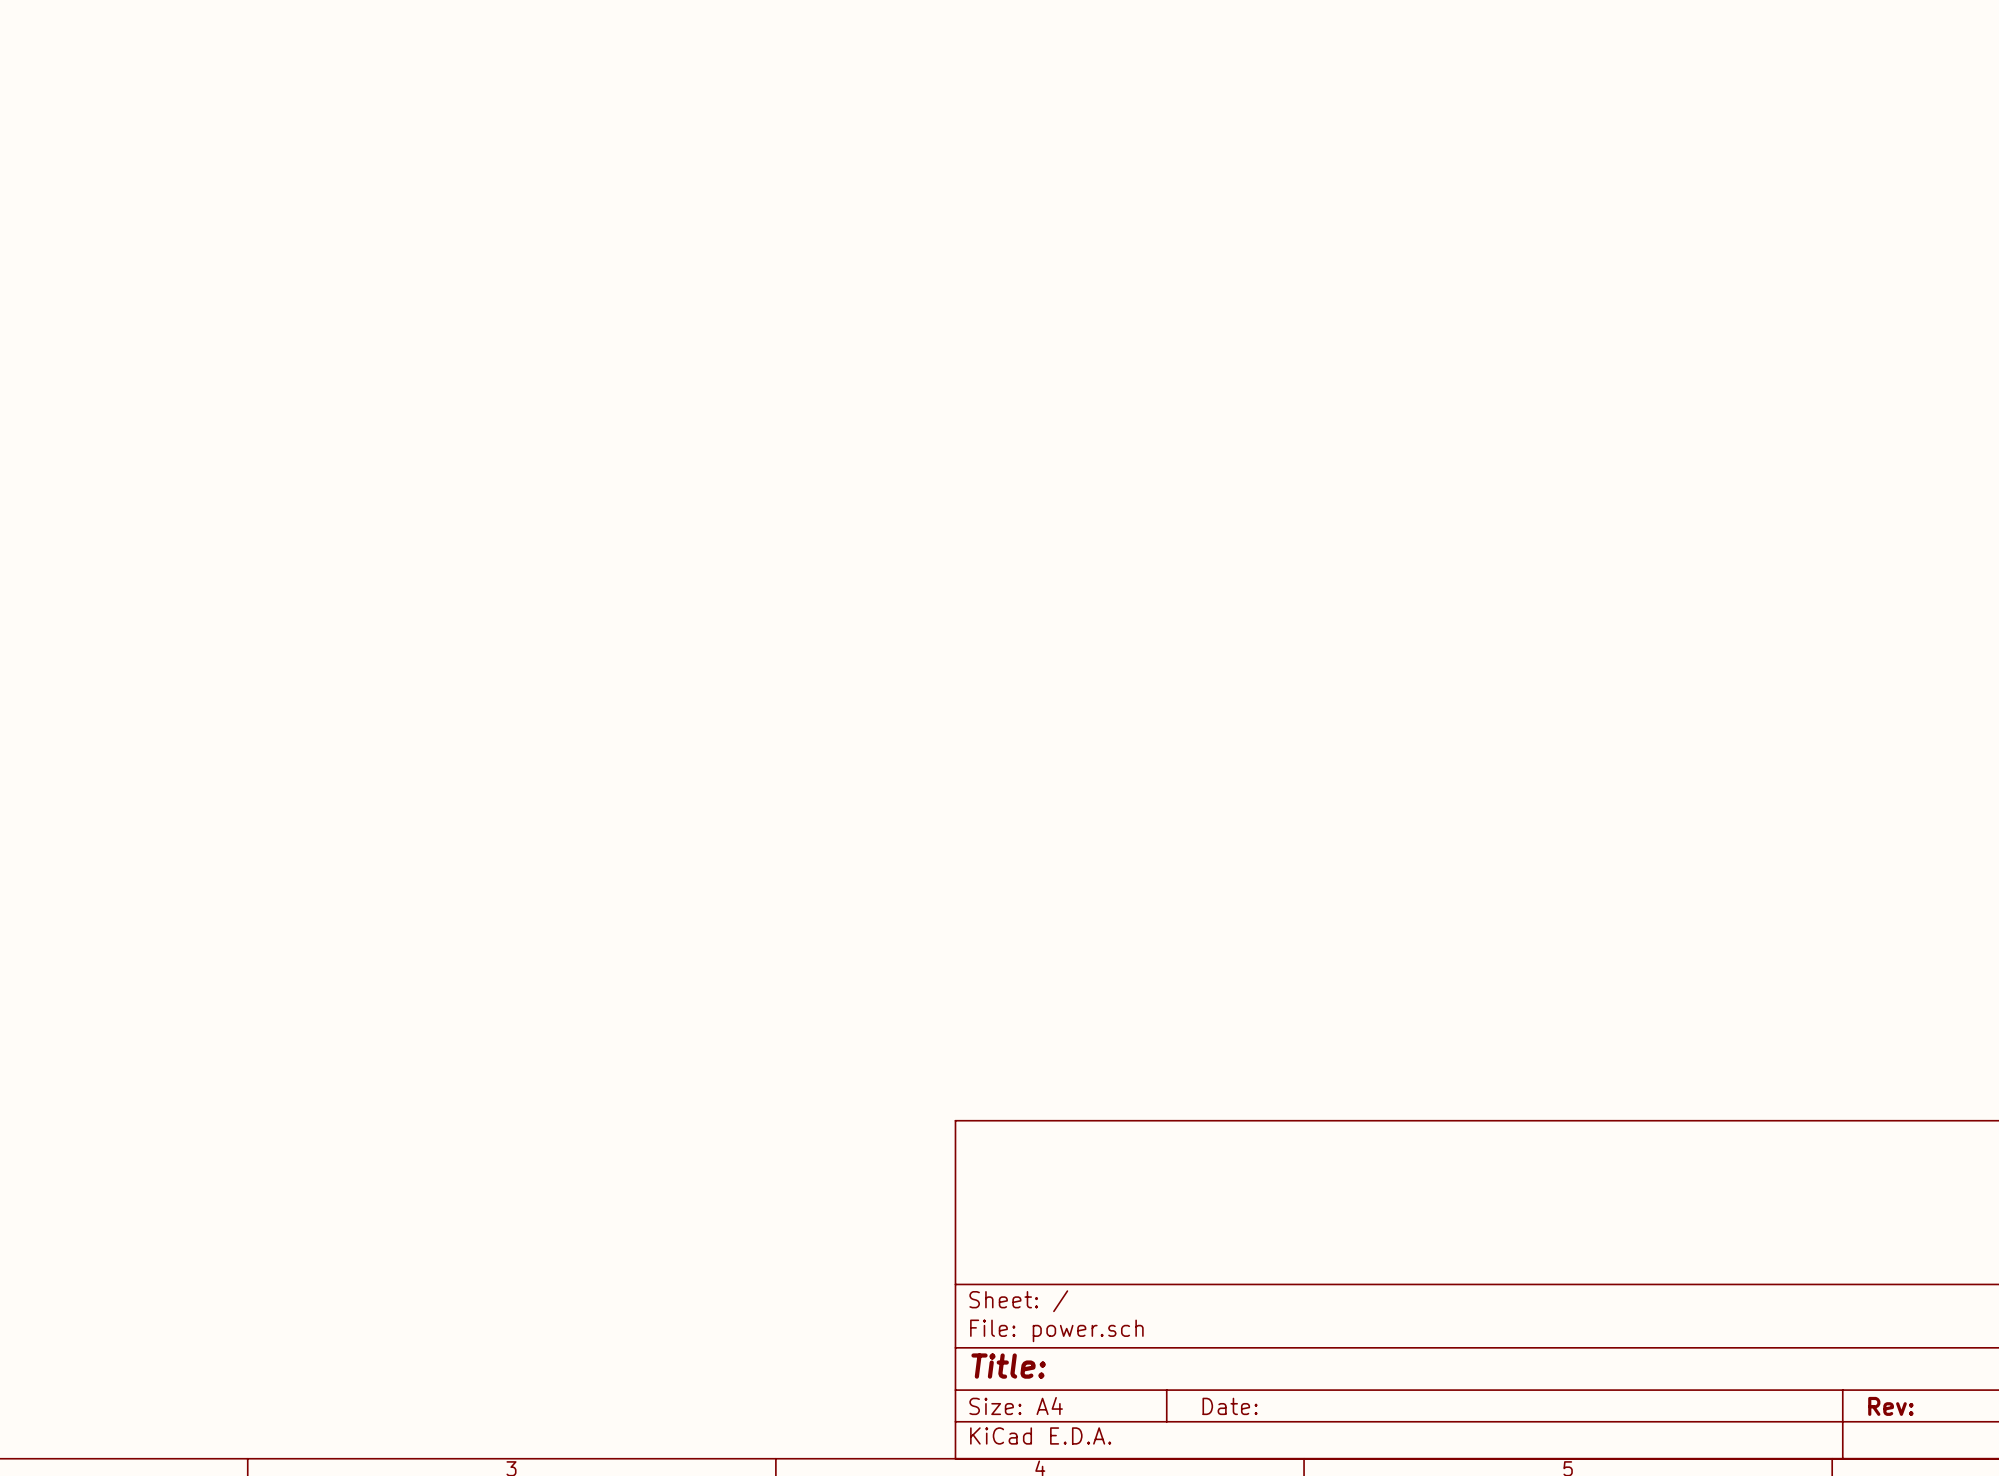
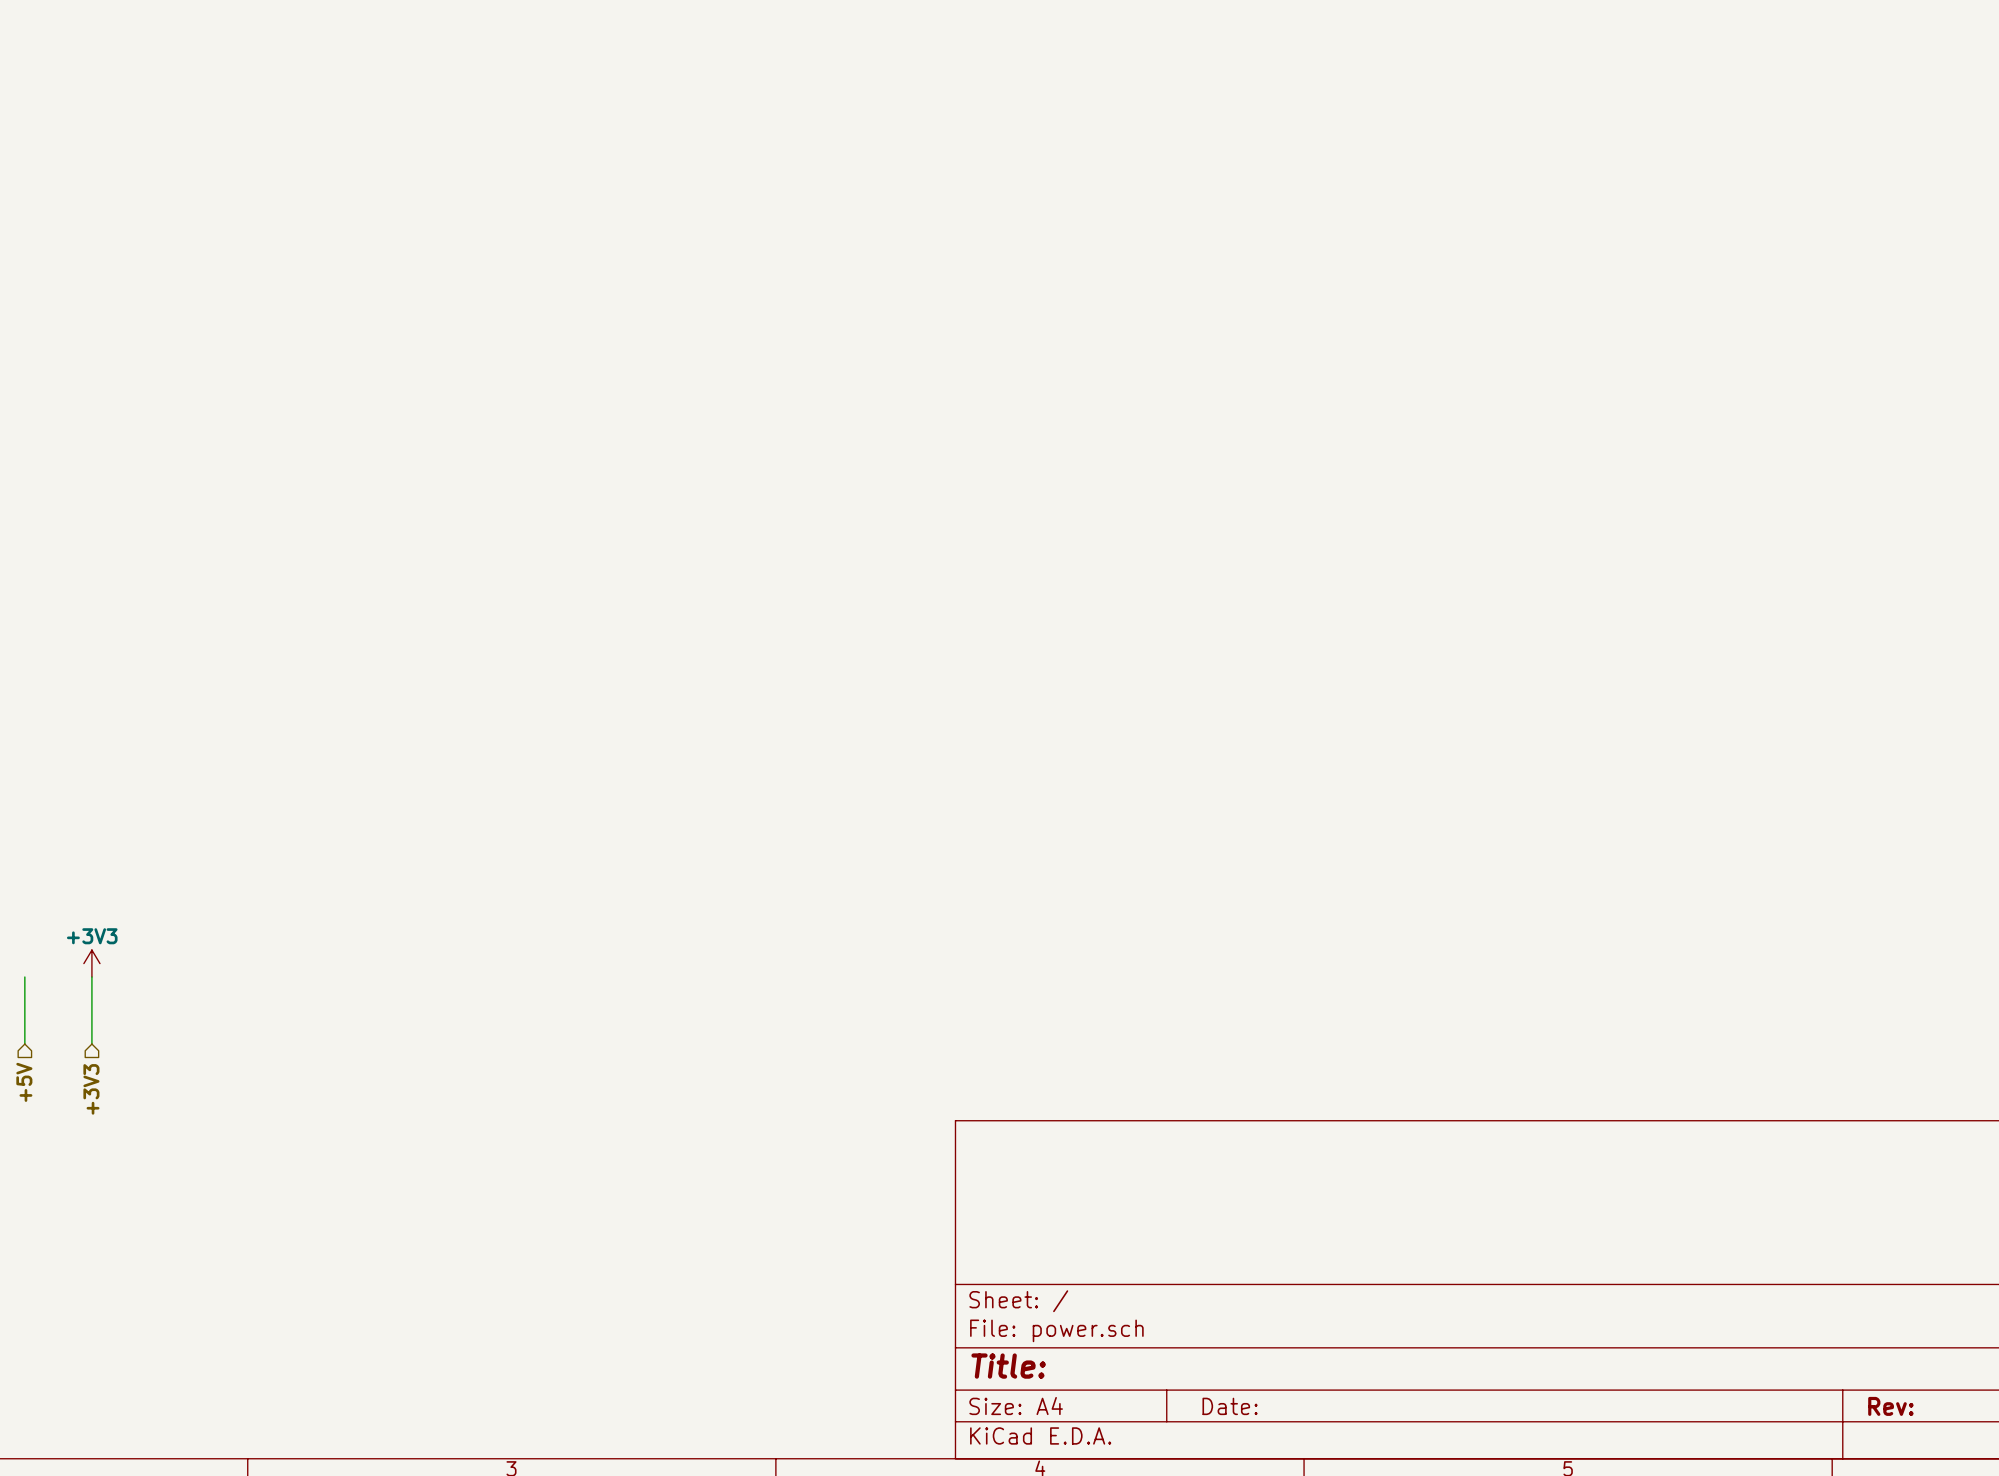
power symbol: none -> +3V3 (91, 963)
wire: none -> (24, 976) (24, 1044)
wire: none -> (91, 976) (91, 1044)
hierarchical label: none -> +5V (24, 1082)
hierarchical label: none -> +3V3 (91, 1089)

